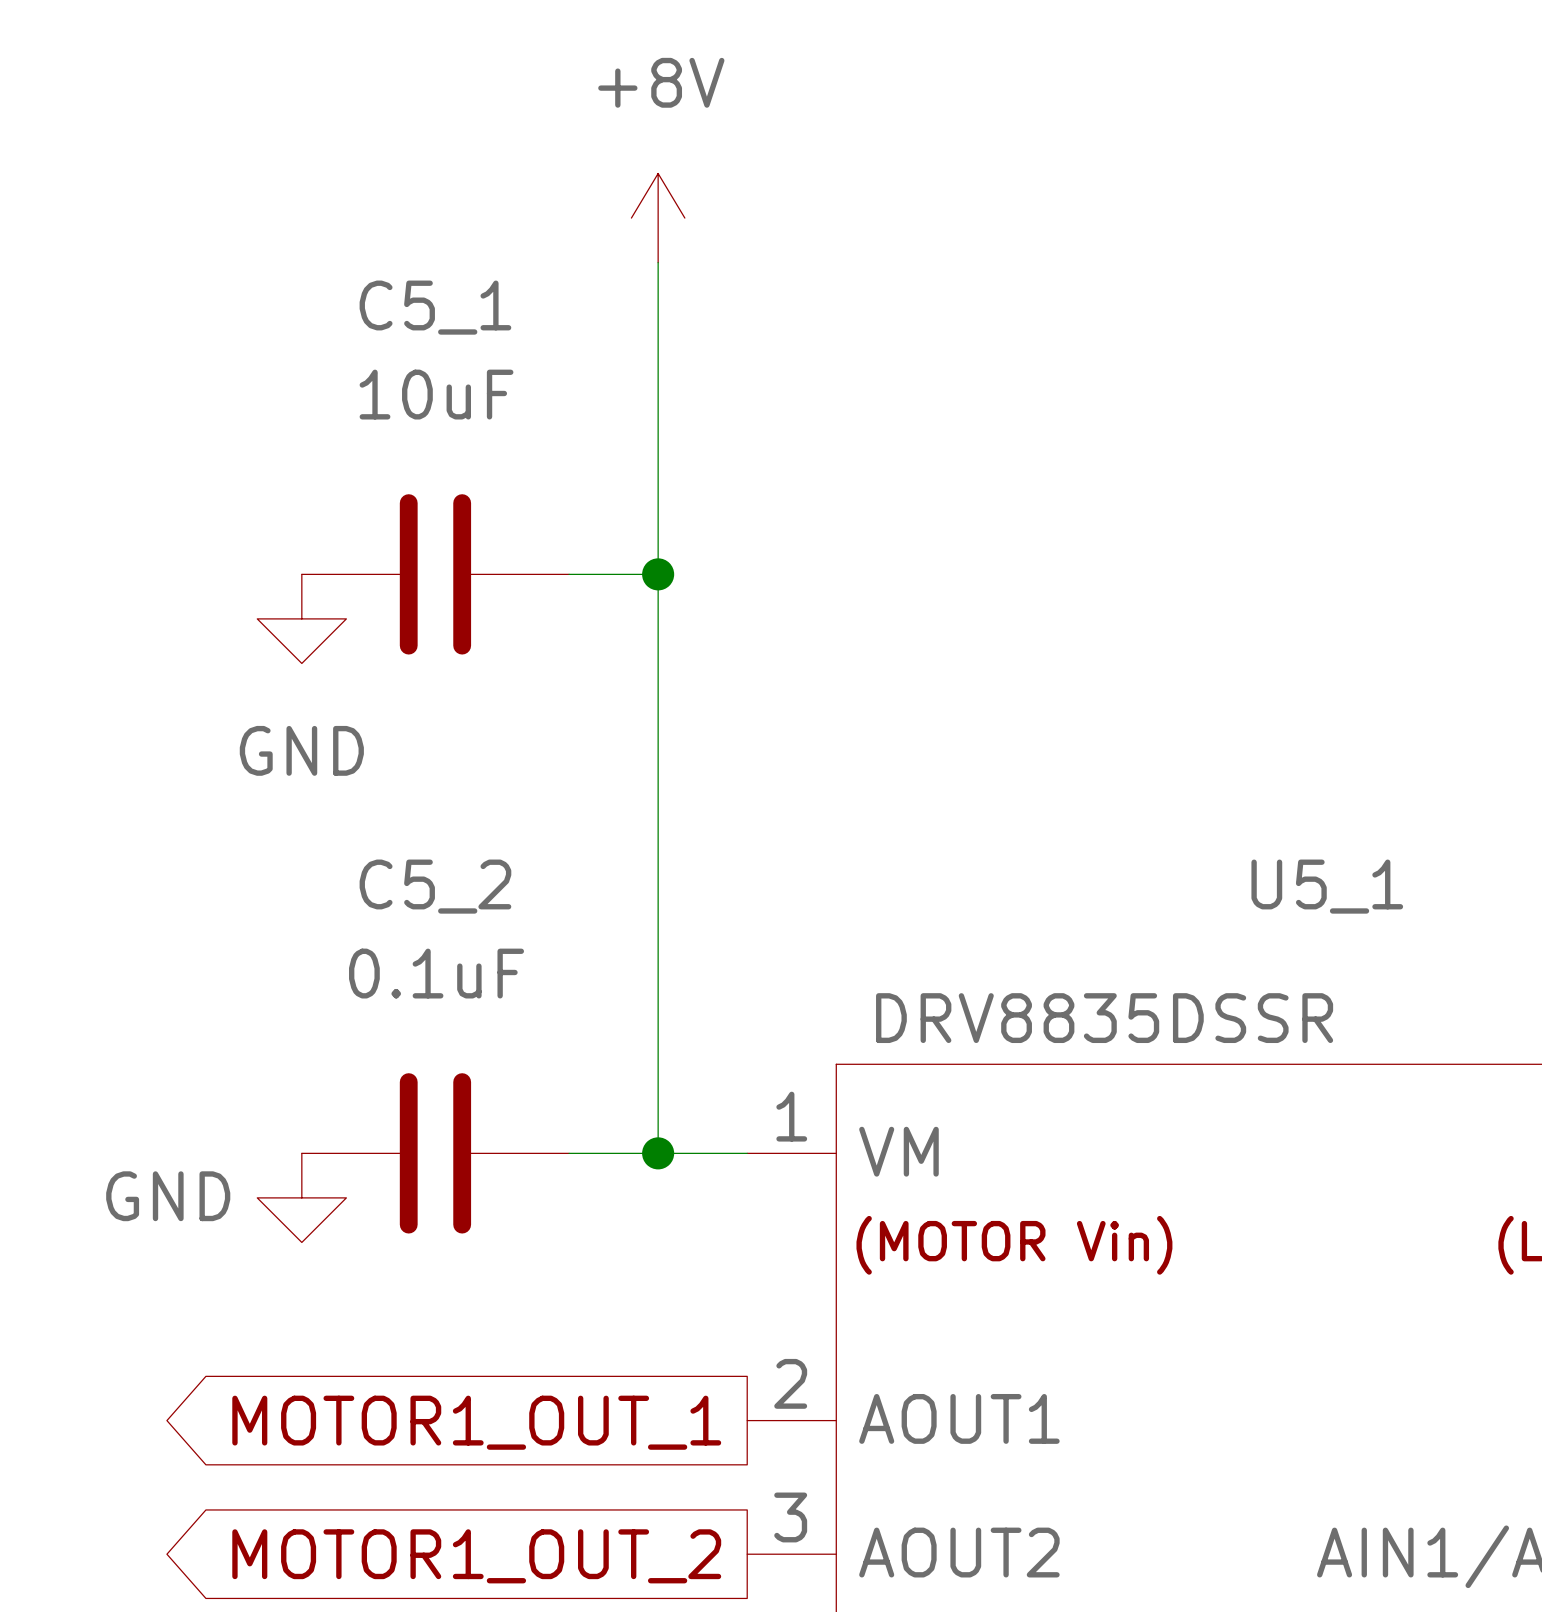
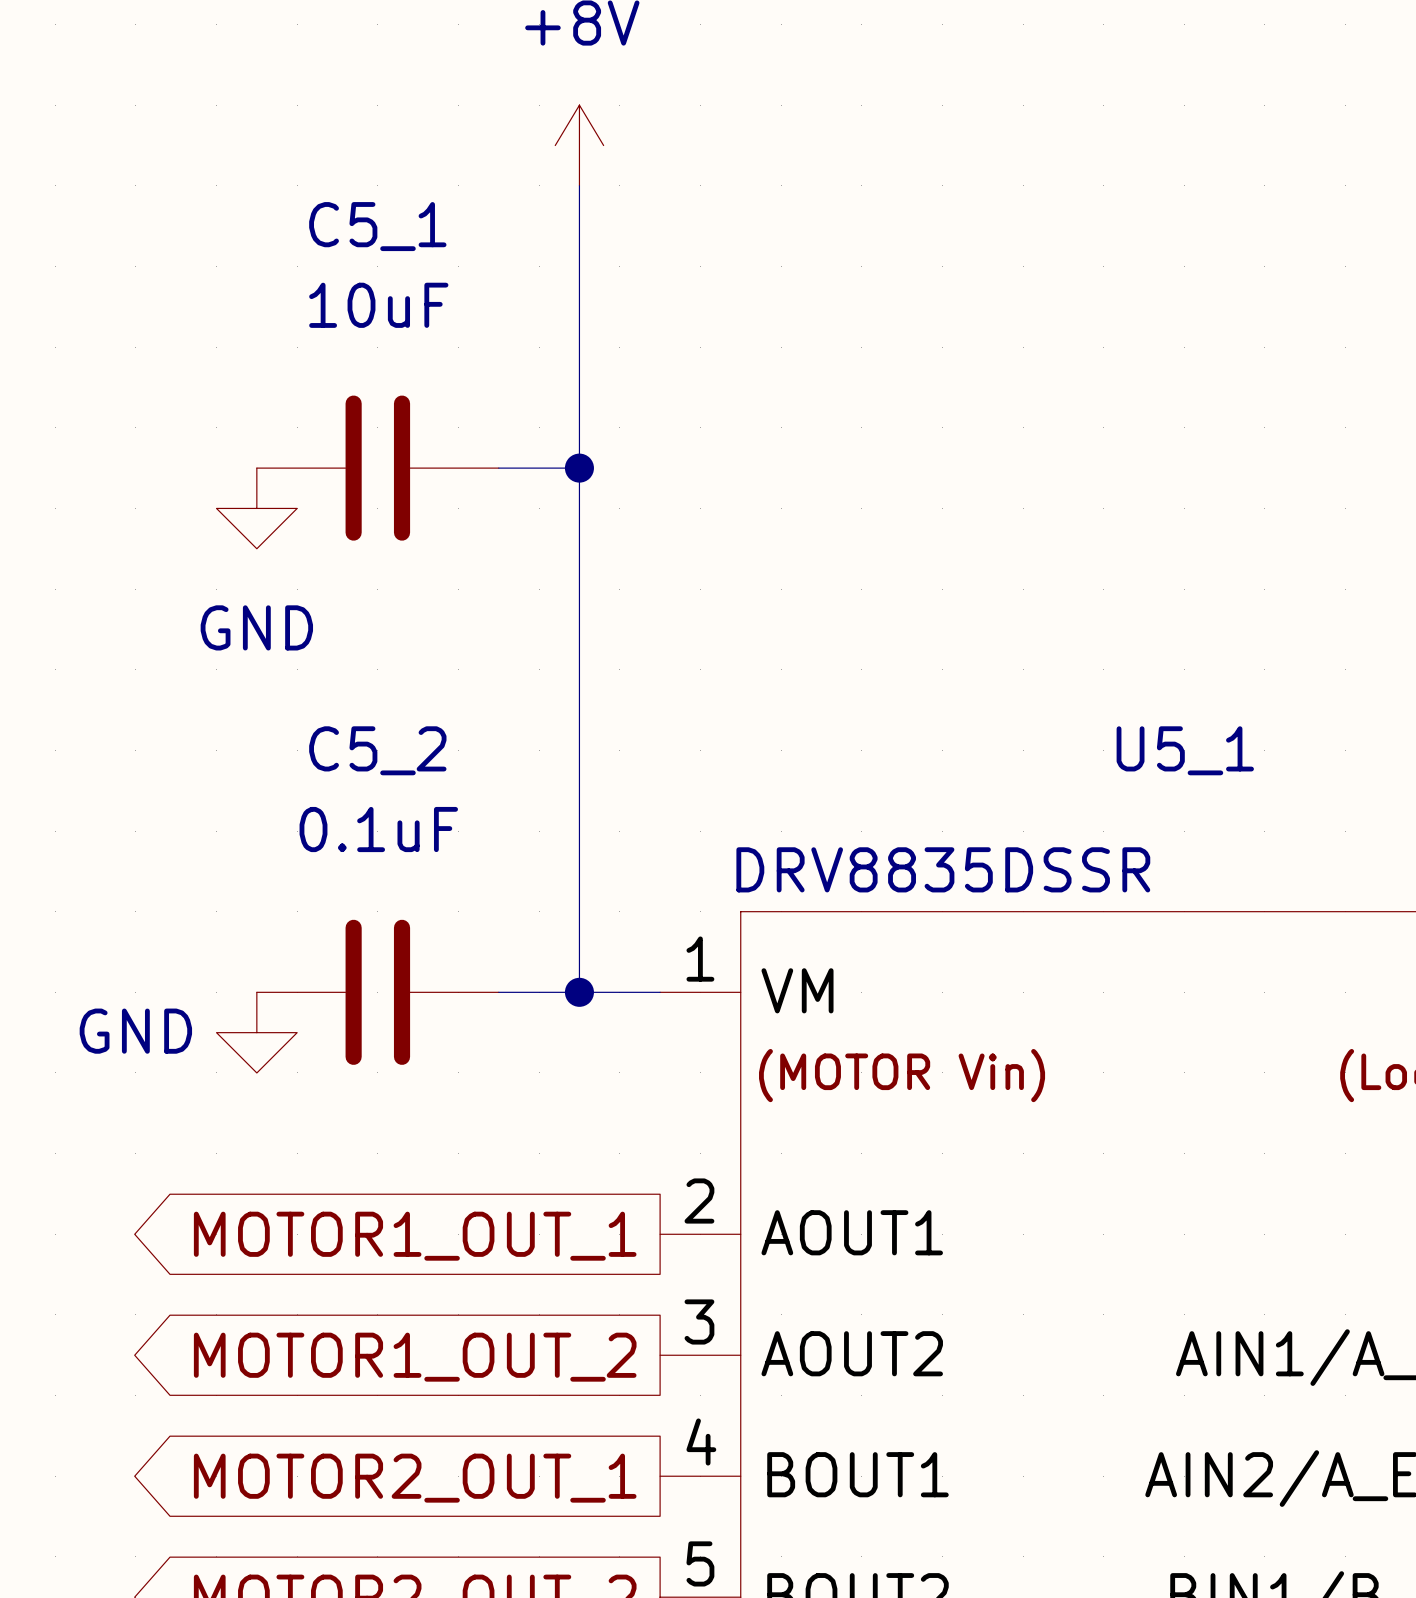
U5_1 value position: DRV8835DSSR (1104, 1018) -> DRV8835DSSR (943, 869)

